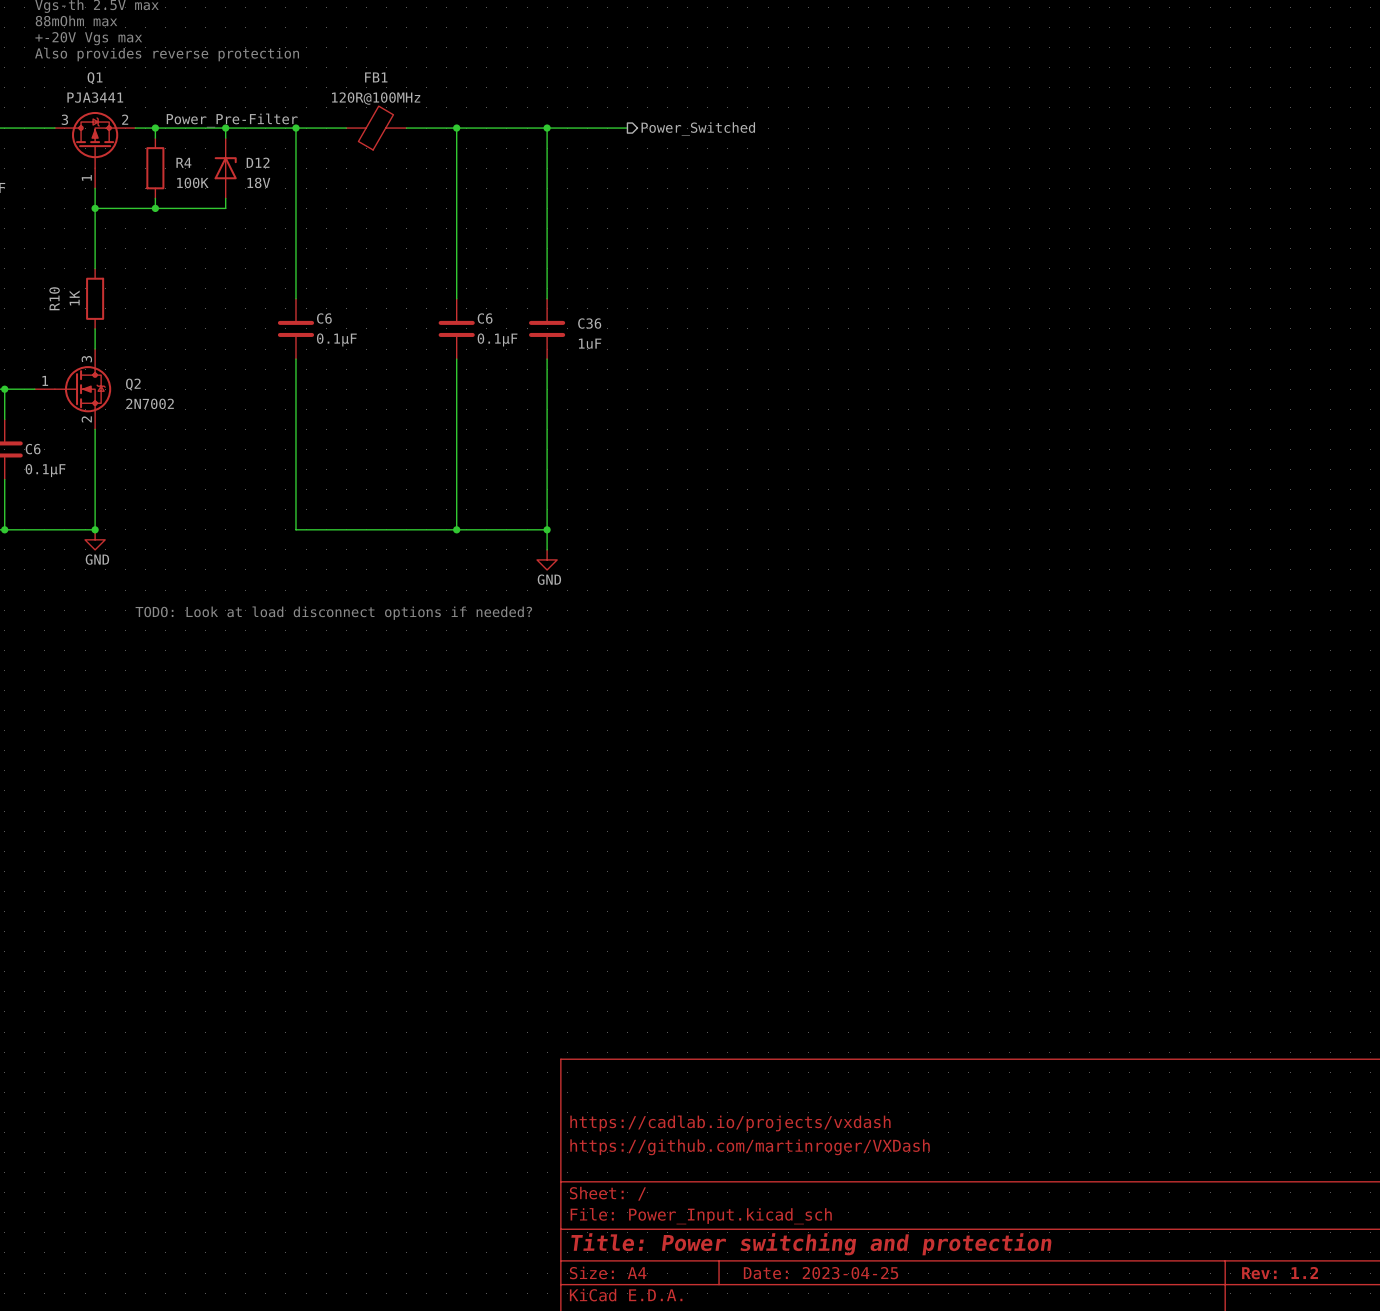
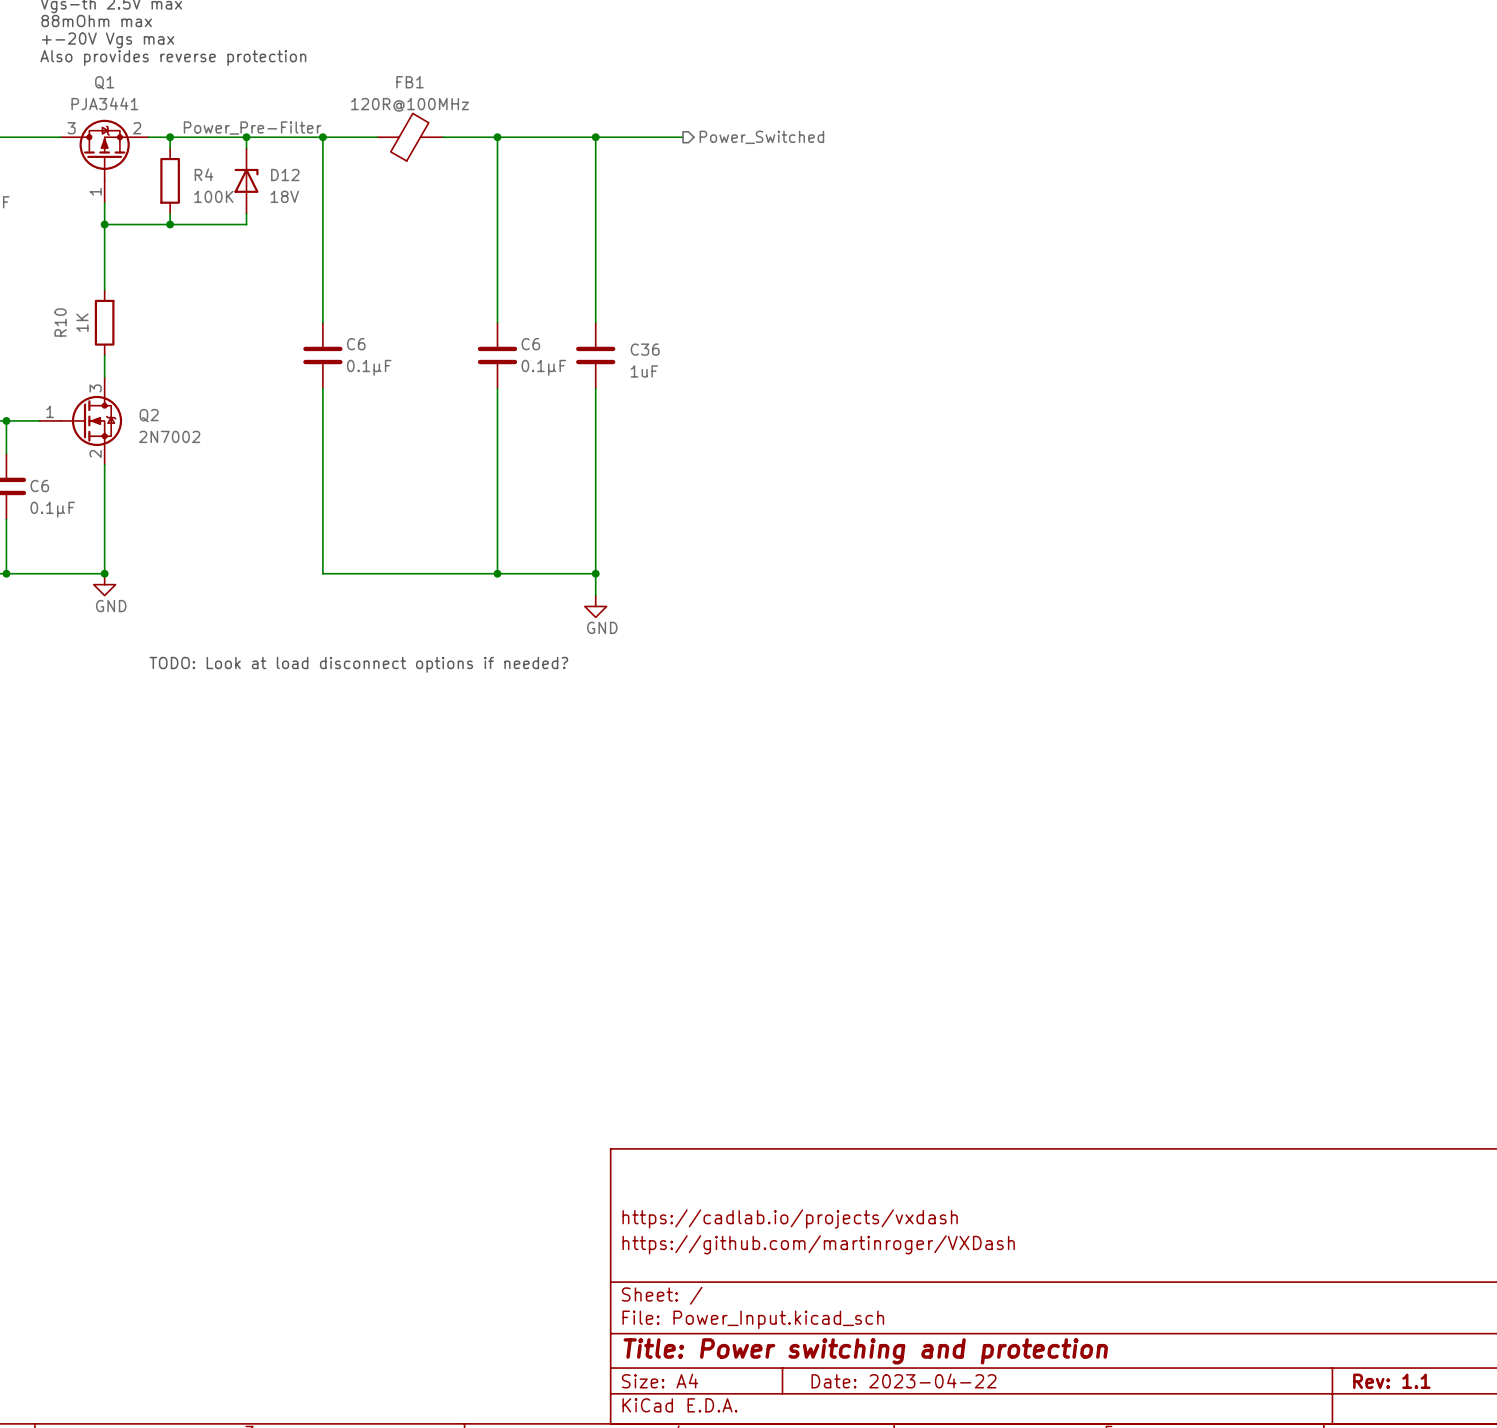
title block: Date: 2023-04-25 (821, 1273) -> Date: 2023-04-22 (903, 1380)
title block: Rev: 1.2 (1280, 1273) -> Rev: 1.1 (1391, 1381)

